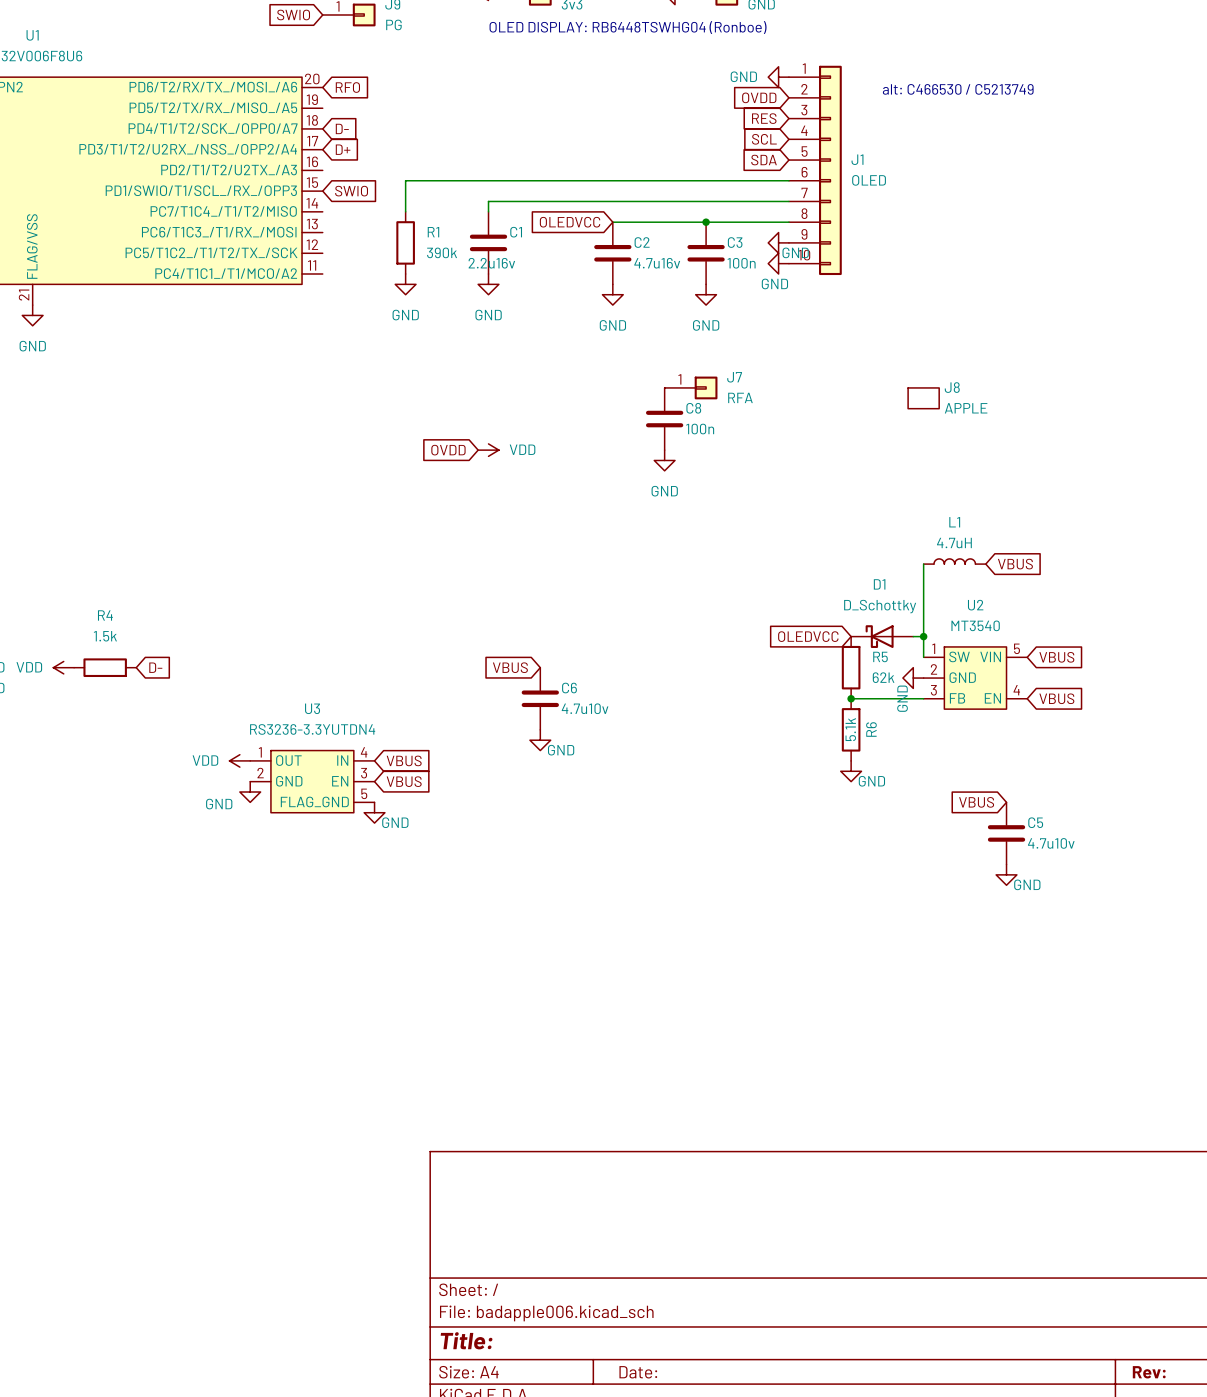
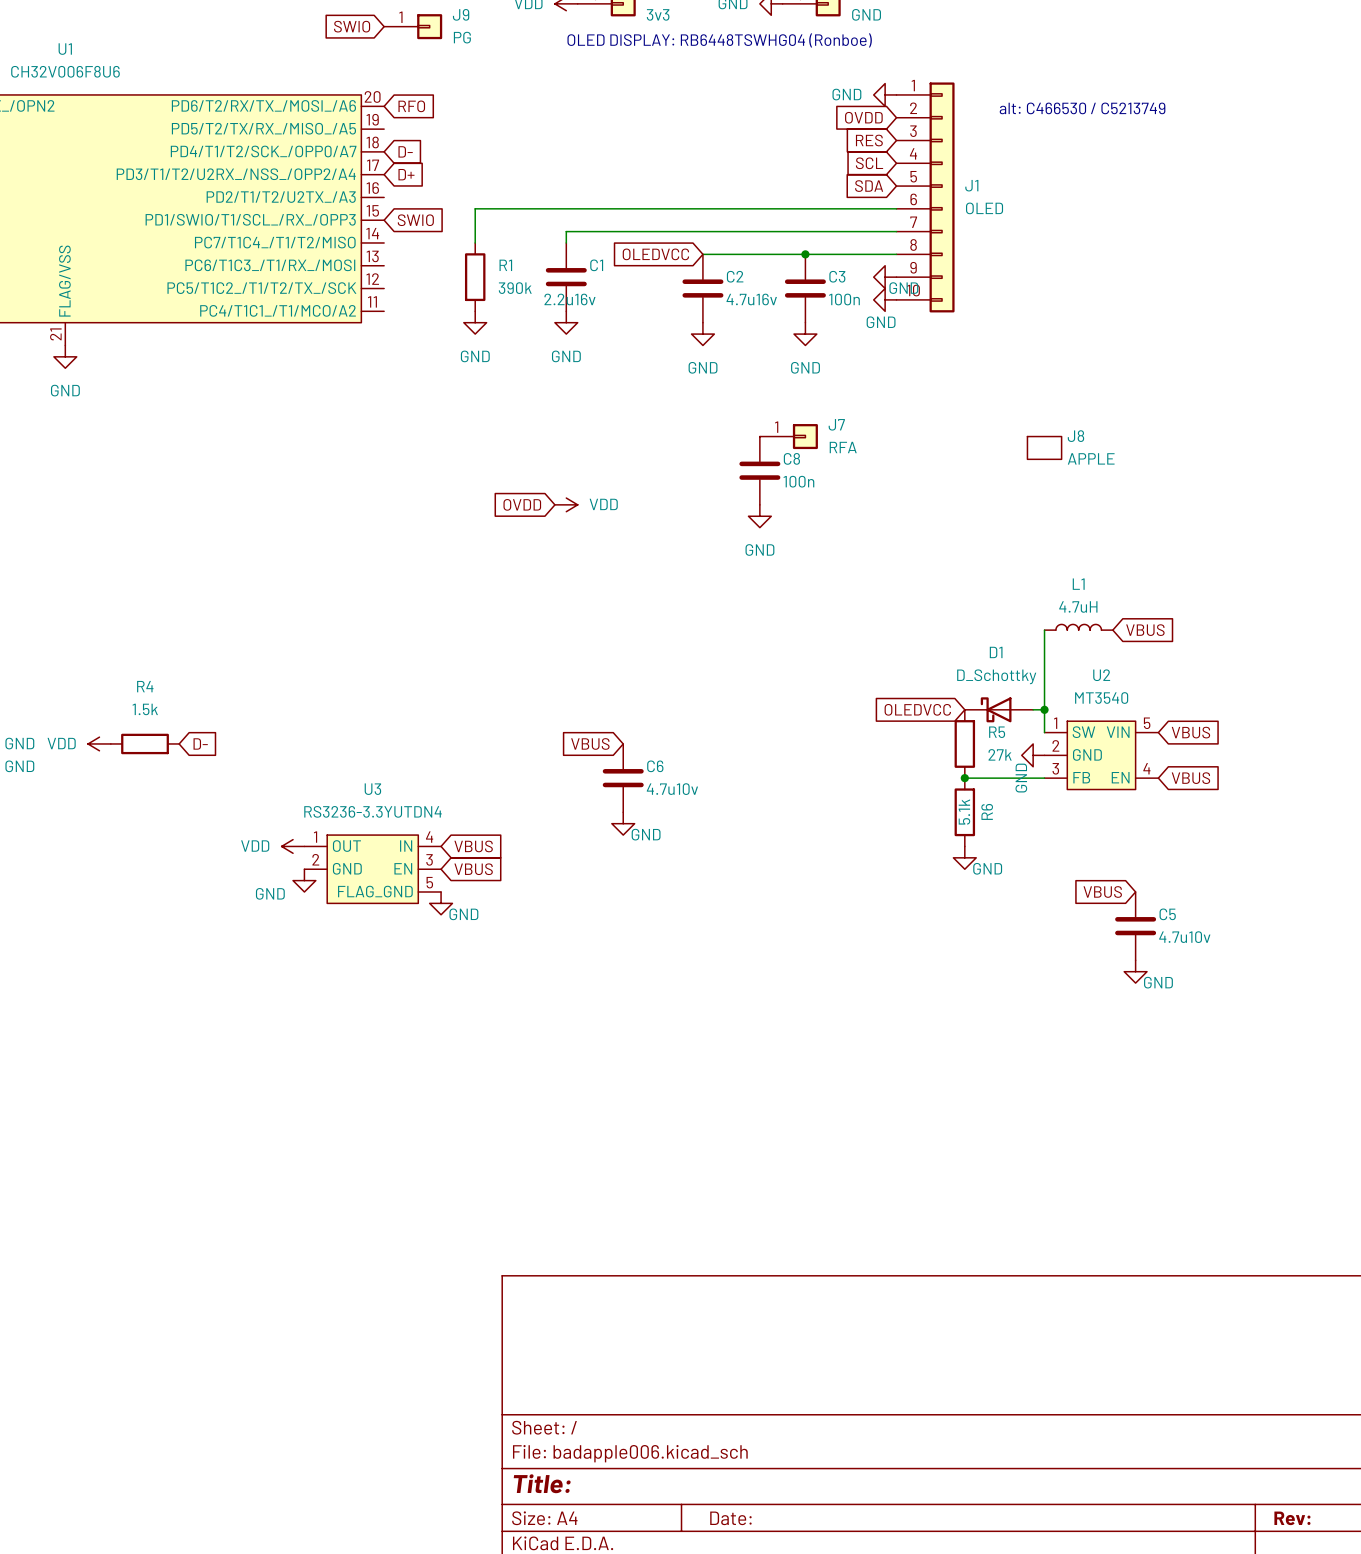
R5 value: 62k (883, 677) -> 27k (1000, 754)

